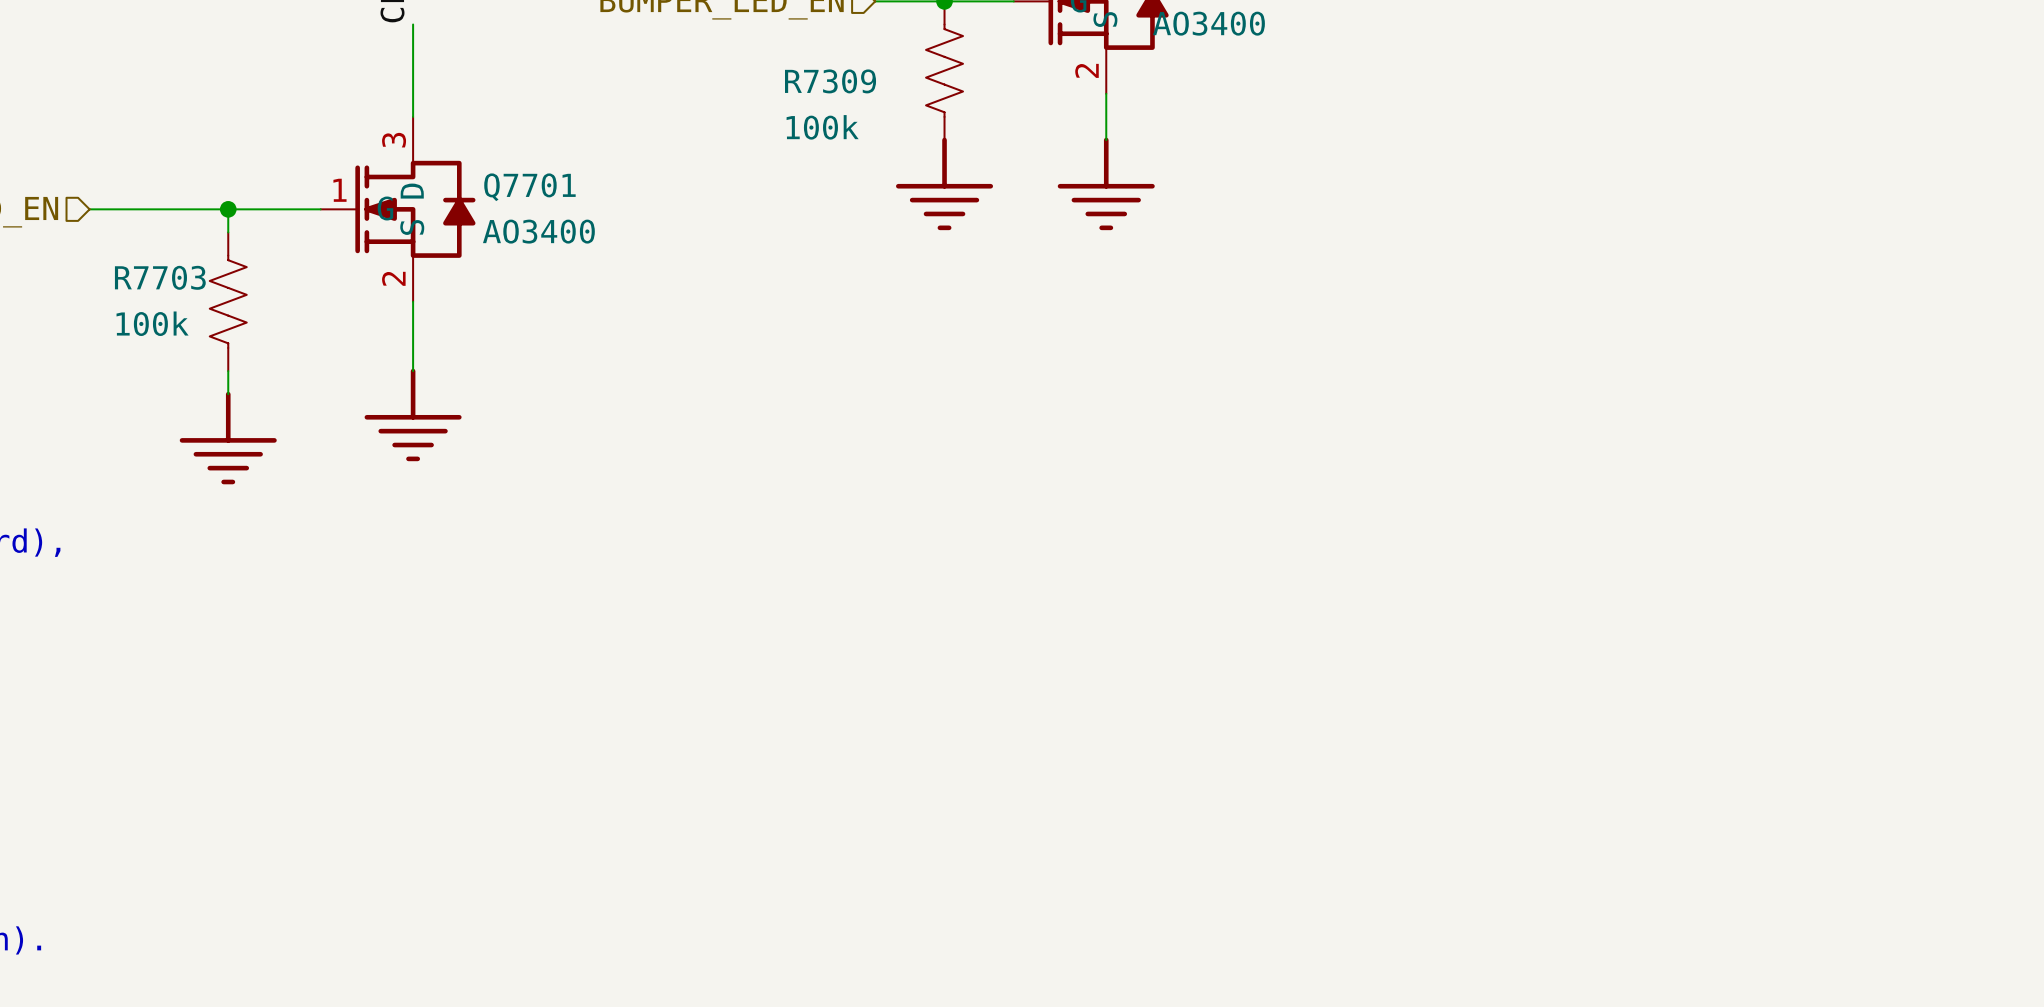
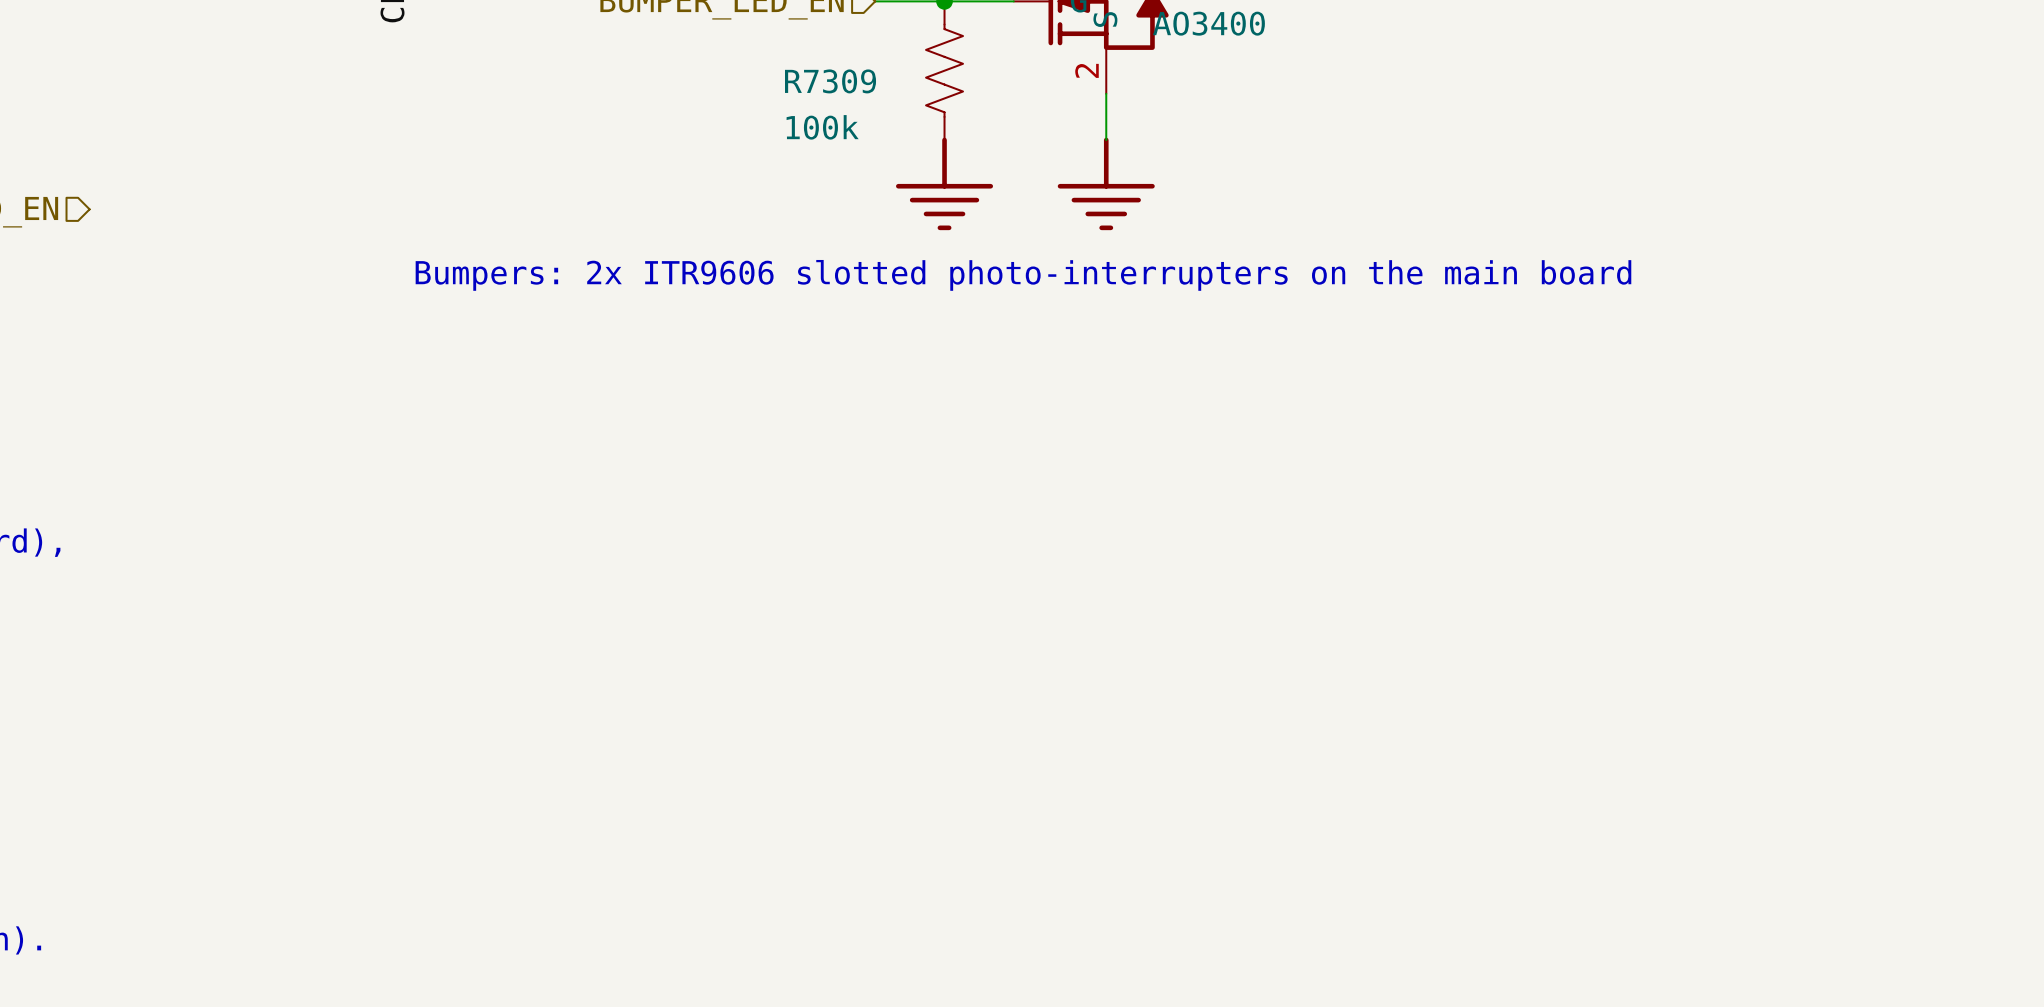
wire: (413, 24) (413, 116) -> none
wire: (89, 209) (320, 209) -> none
wire: (228, 209) (228, 232) -> none
junction: (228, 209) -> none
Q7701: AO3400 (398, 209) -> none
text: none -> Bumpers: 2x ITR9606 slotted photo-interrupters on the main board (1023, 275)
R7703: 100k (228, 301) -> none
wire: (413, 301) (413, 371) -> none
wire: (228, 371) (228, 394) -> none
power symbol: (413, 414) -> none
power symbol: (228, 438) -> none

